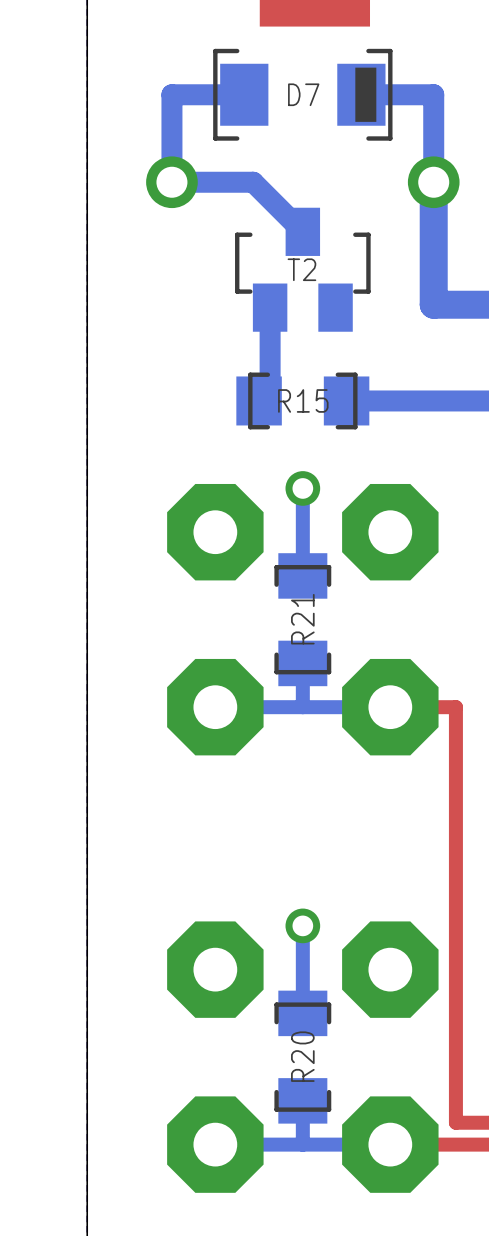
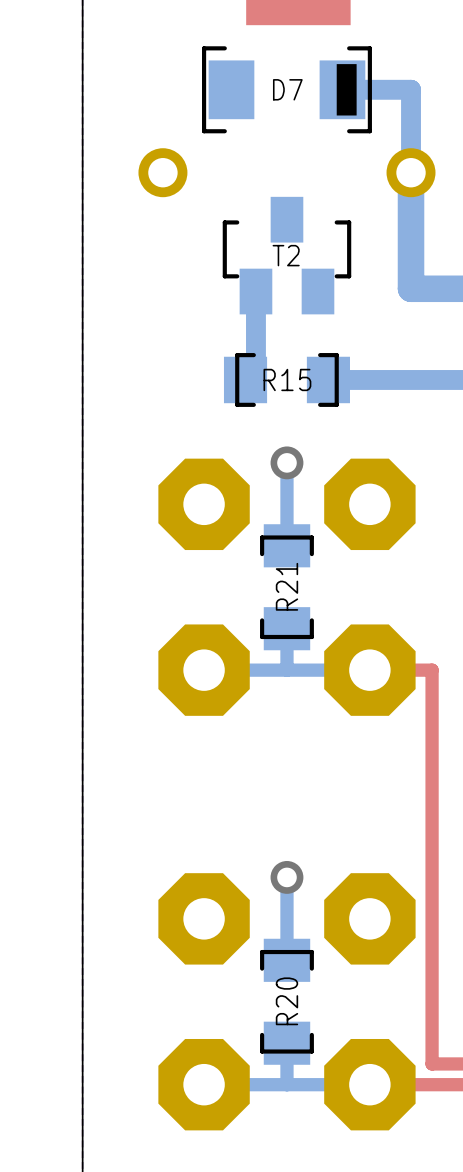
bottom track: (244, 94) (171, 94) (171, 182) (253, 182) (302, 231) -> none

